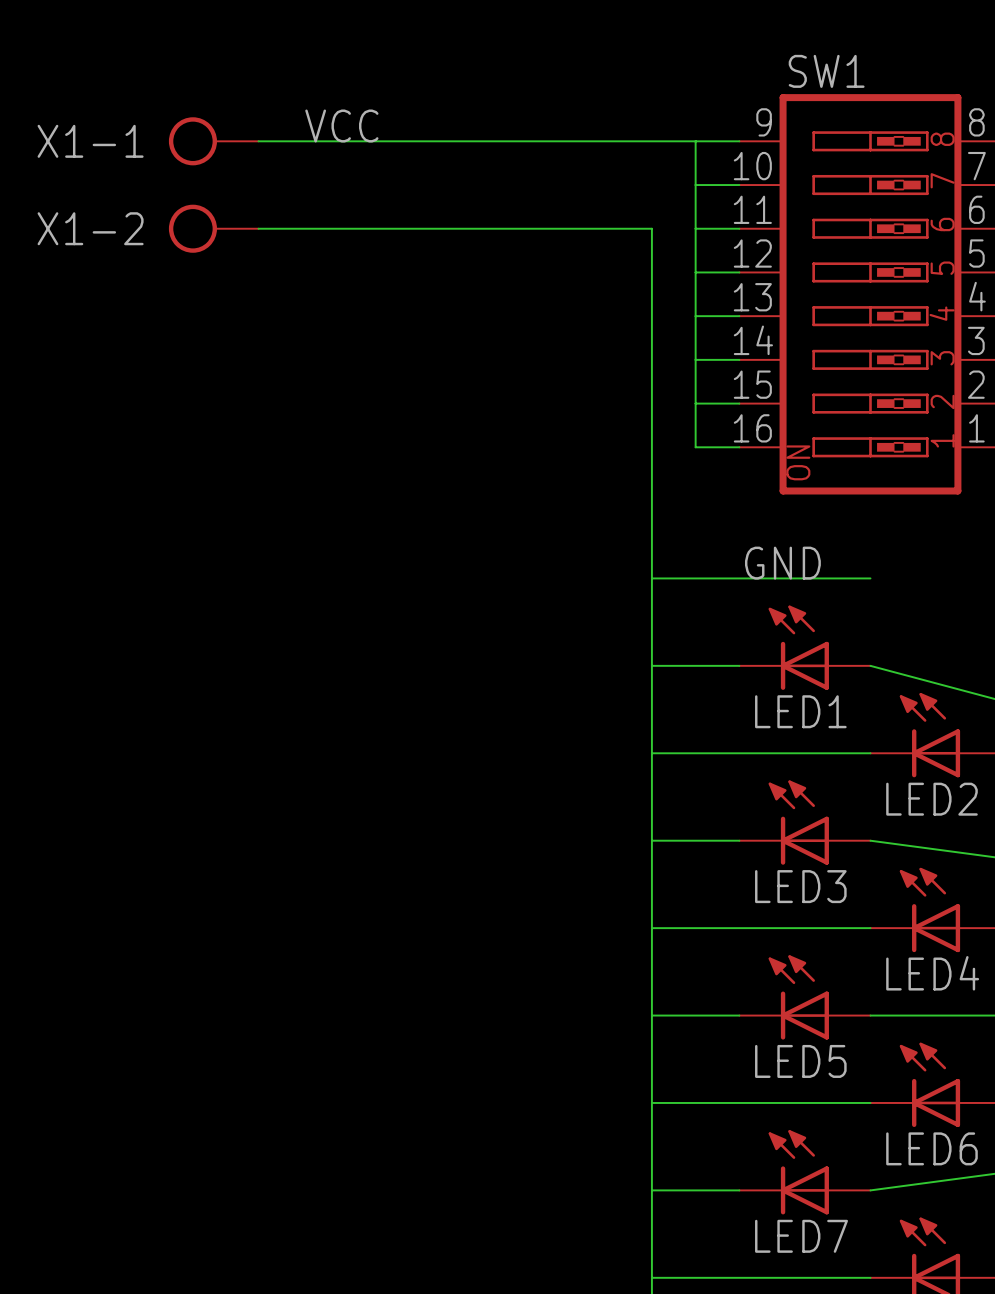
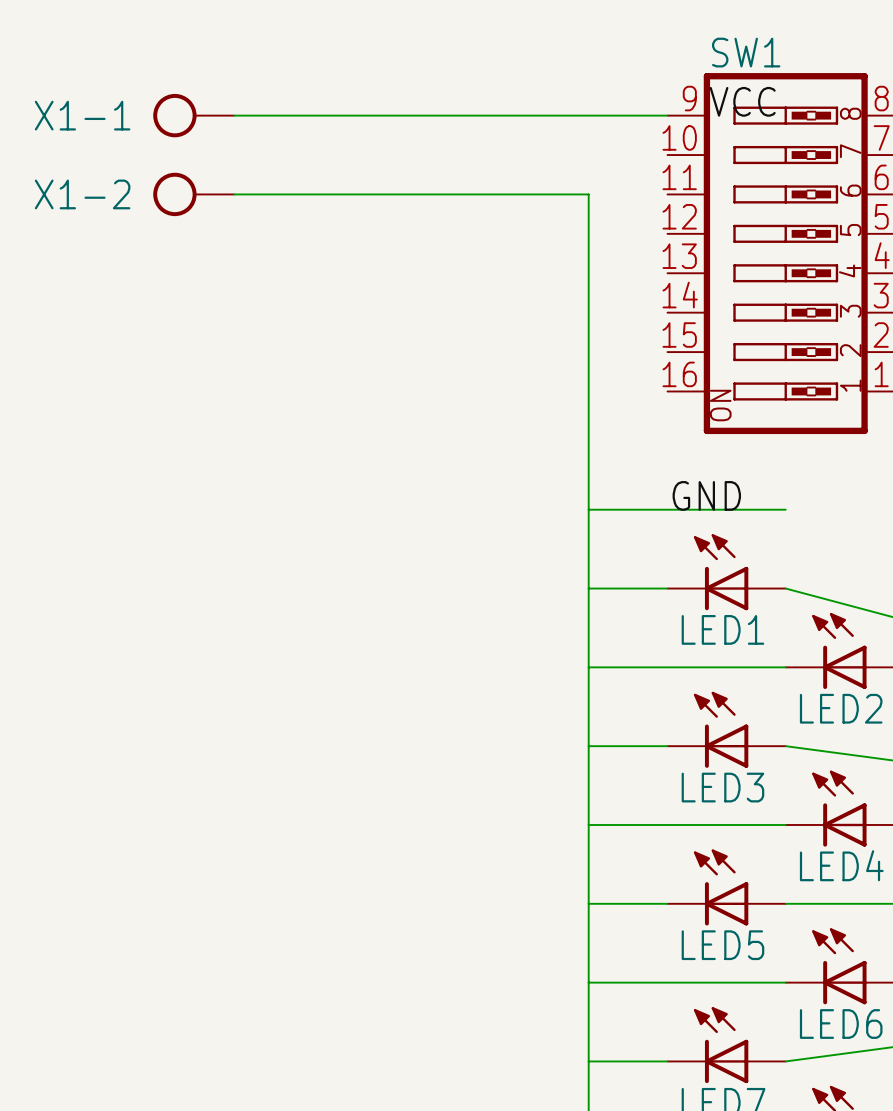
label: VCC (341, 126) -> none
label: none -> VCC (742, 101)
wire: (695, 141) (695, 447) (739, 447) -> none
wire: (695, 185) (739, 185) -> none
wire: (695, 228) (739, 228) -> none
wire: (695, 272) (739, 272) -> none
wire: (695, 316) (739, 316) -> none
wire: (695, 359) (739, 359) -> none
wire: (695, 403) (739, 403) -> none

